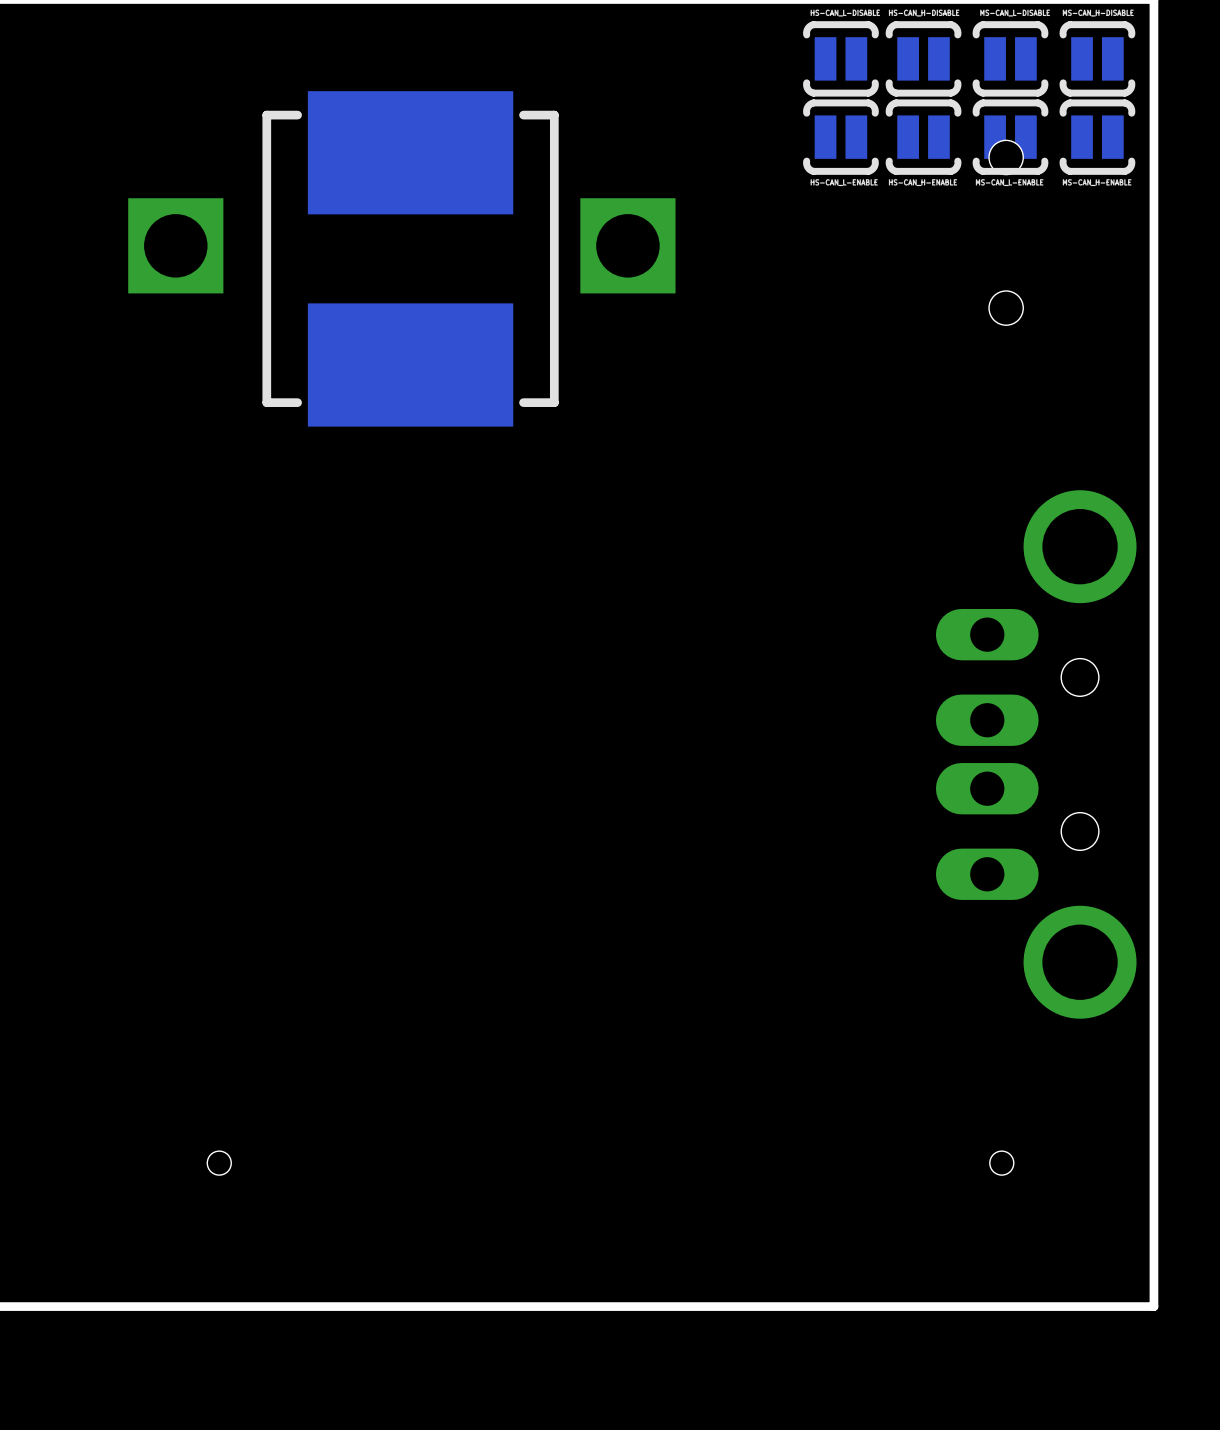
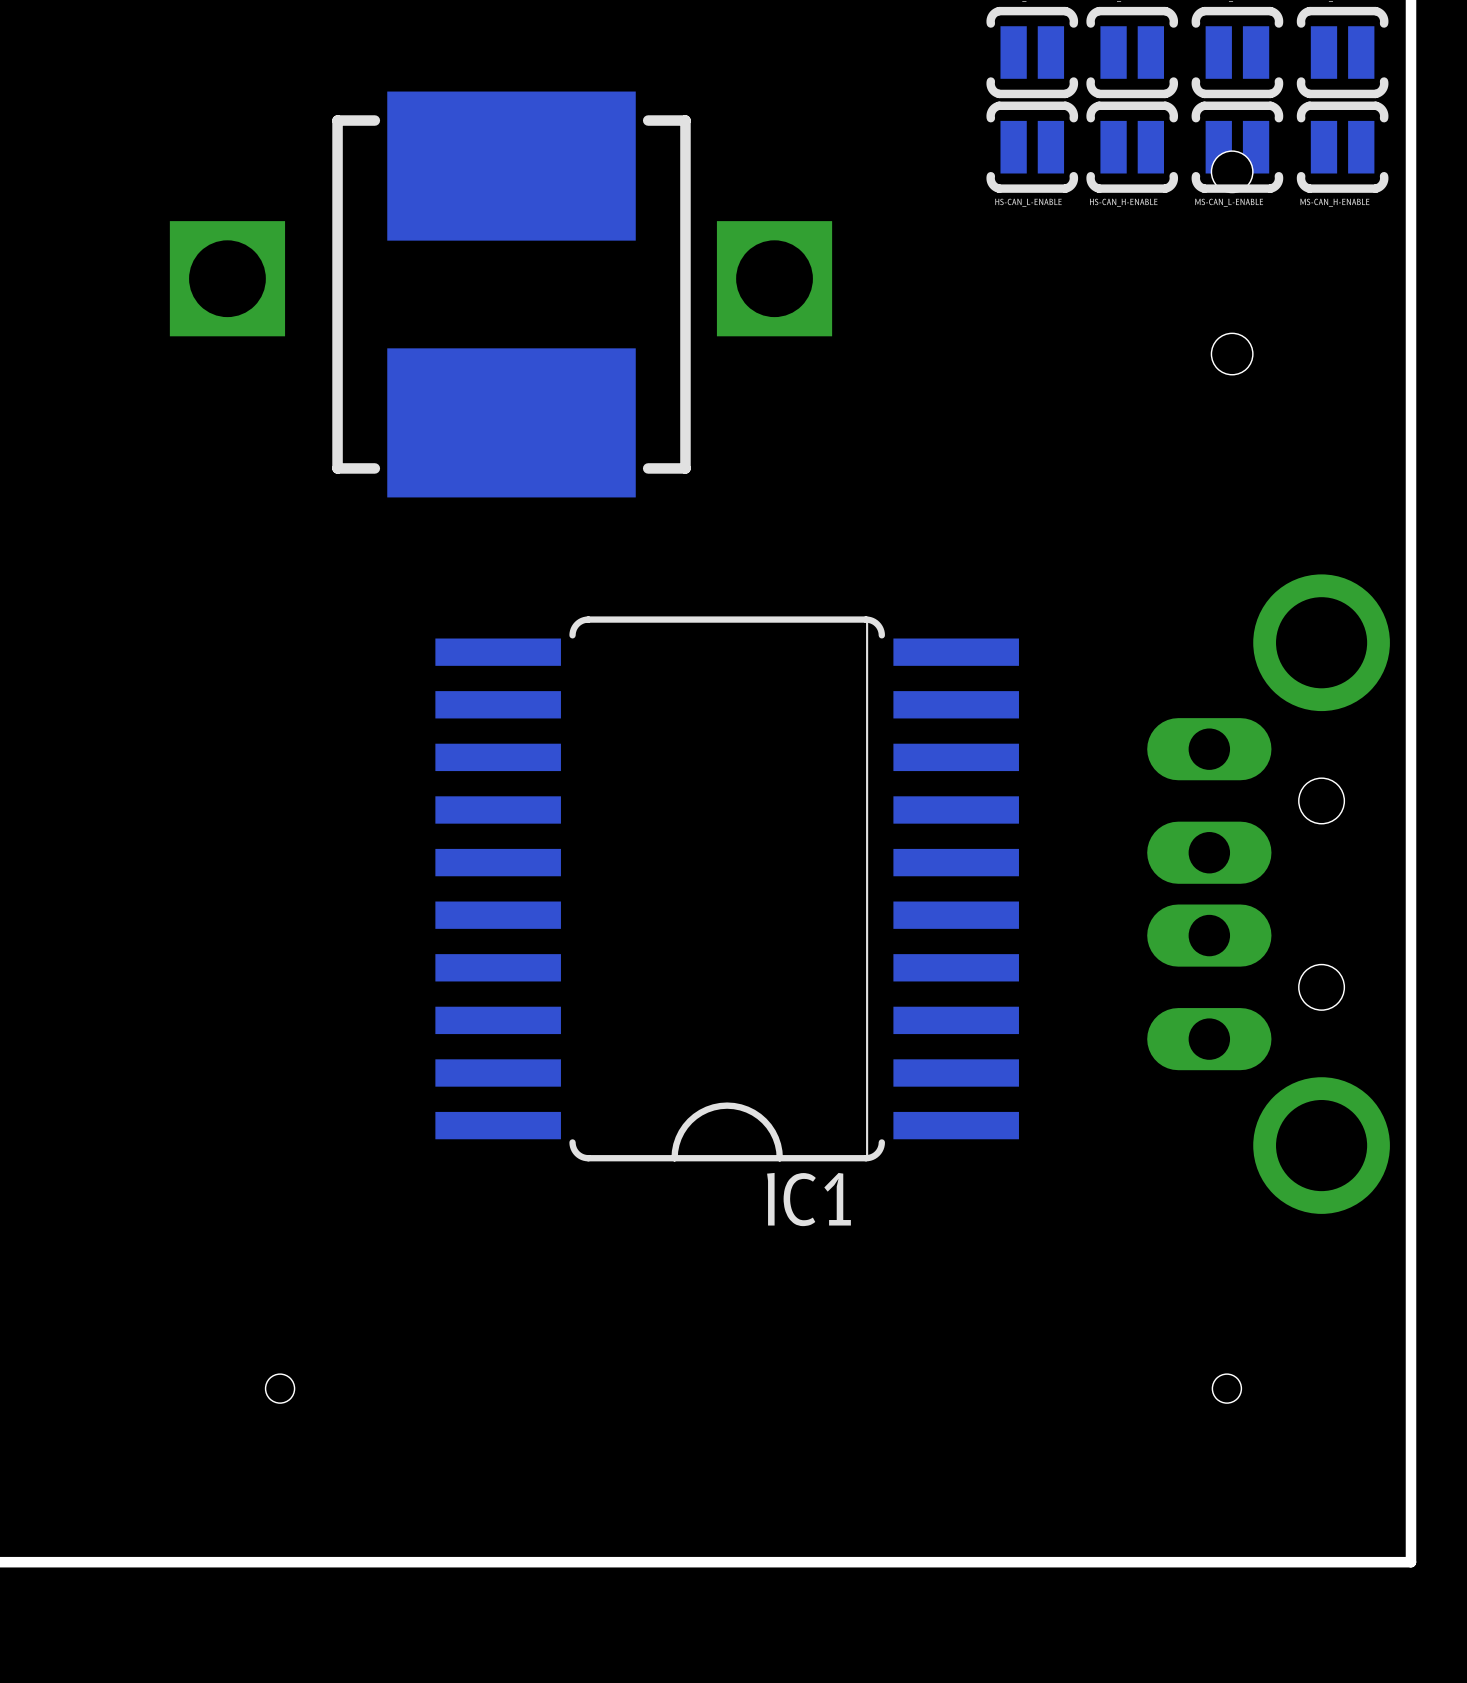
IC1: none -> (727, 888)

